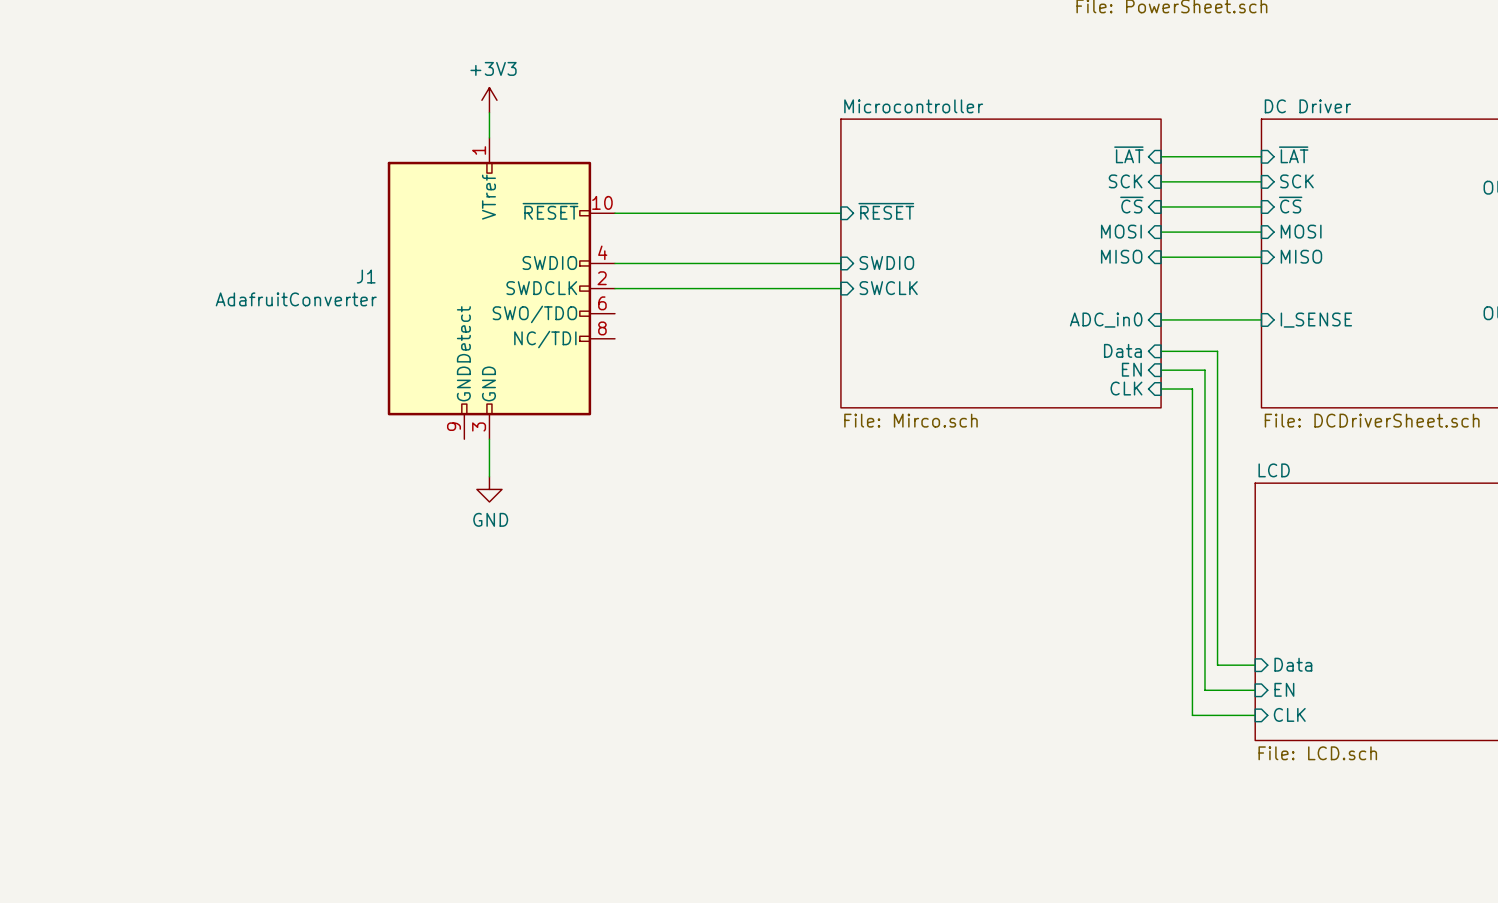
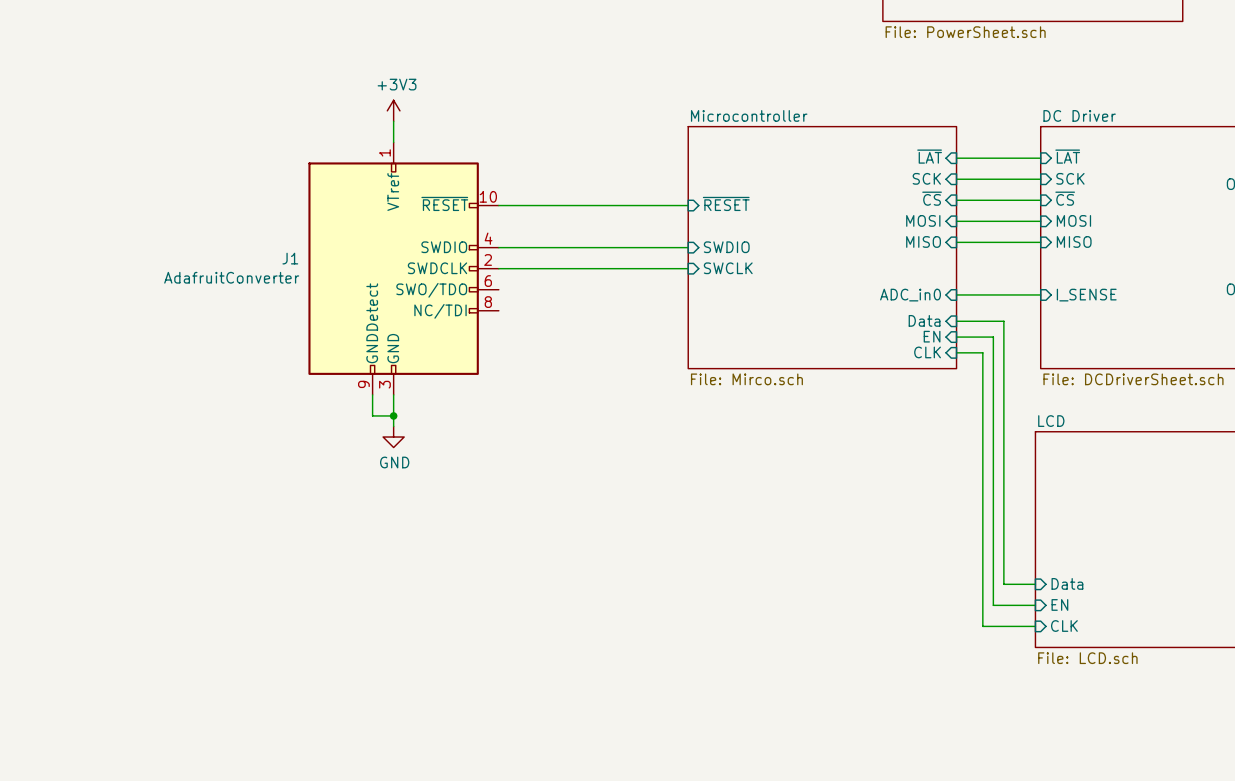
wire: none -> (372, 394) (372, 415) (393, 415)
junction: none -> (393, 415)

